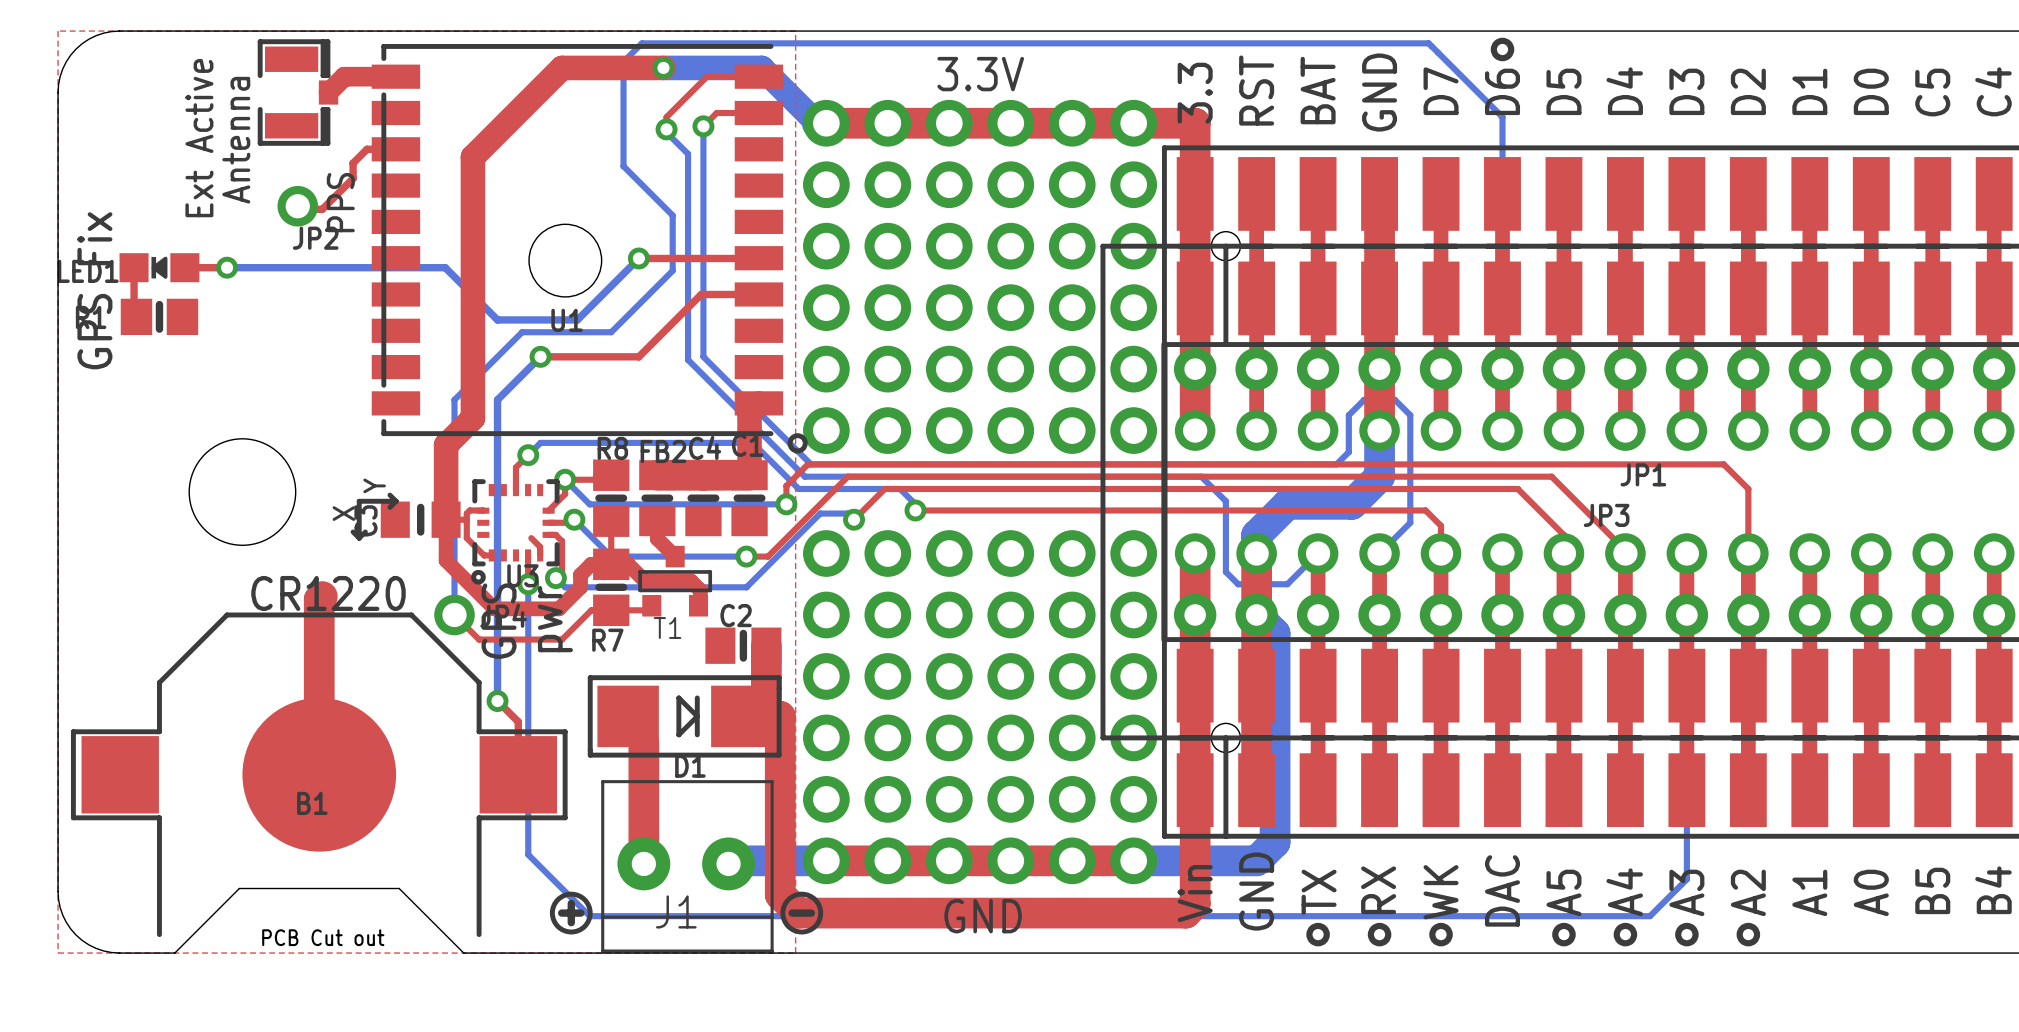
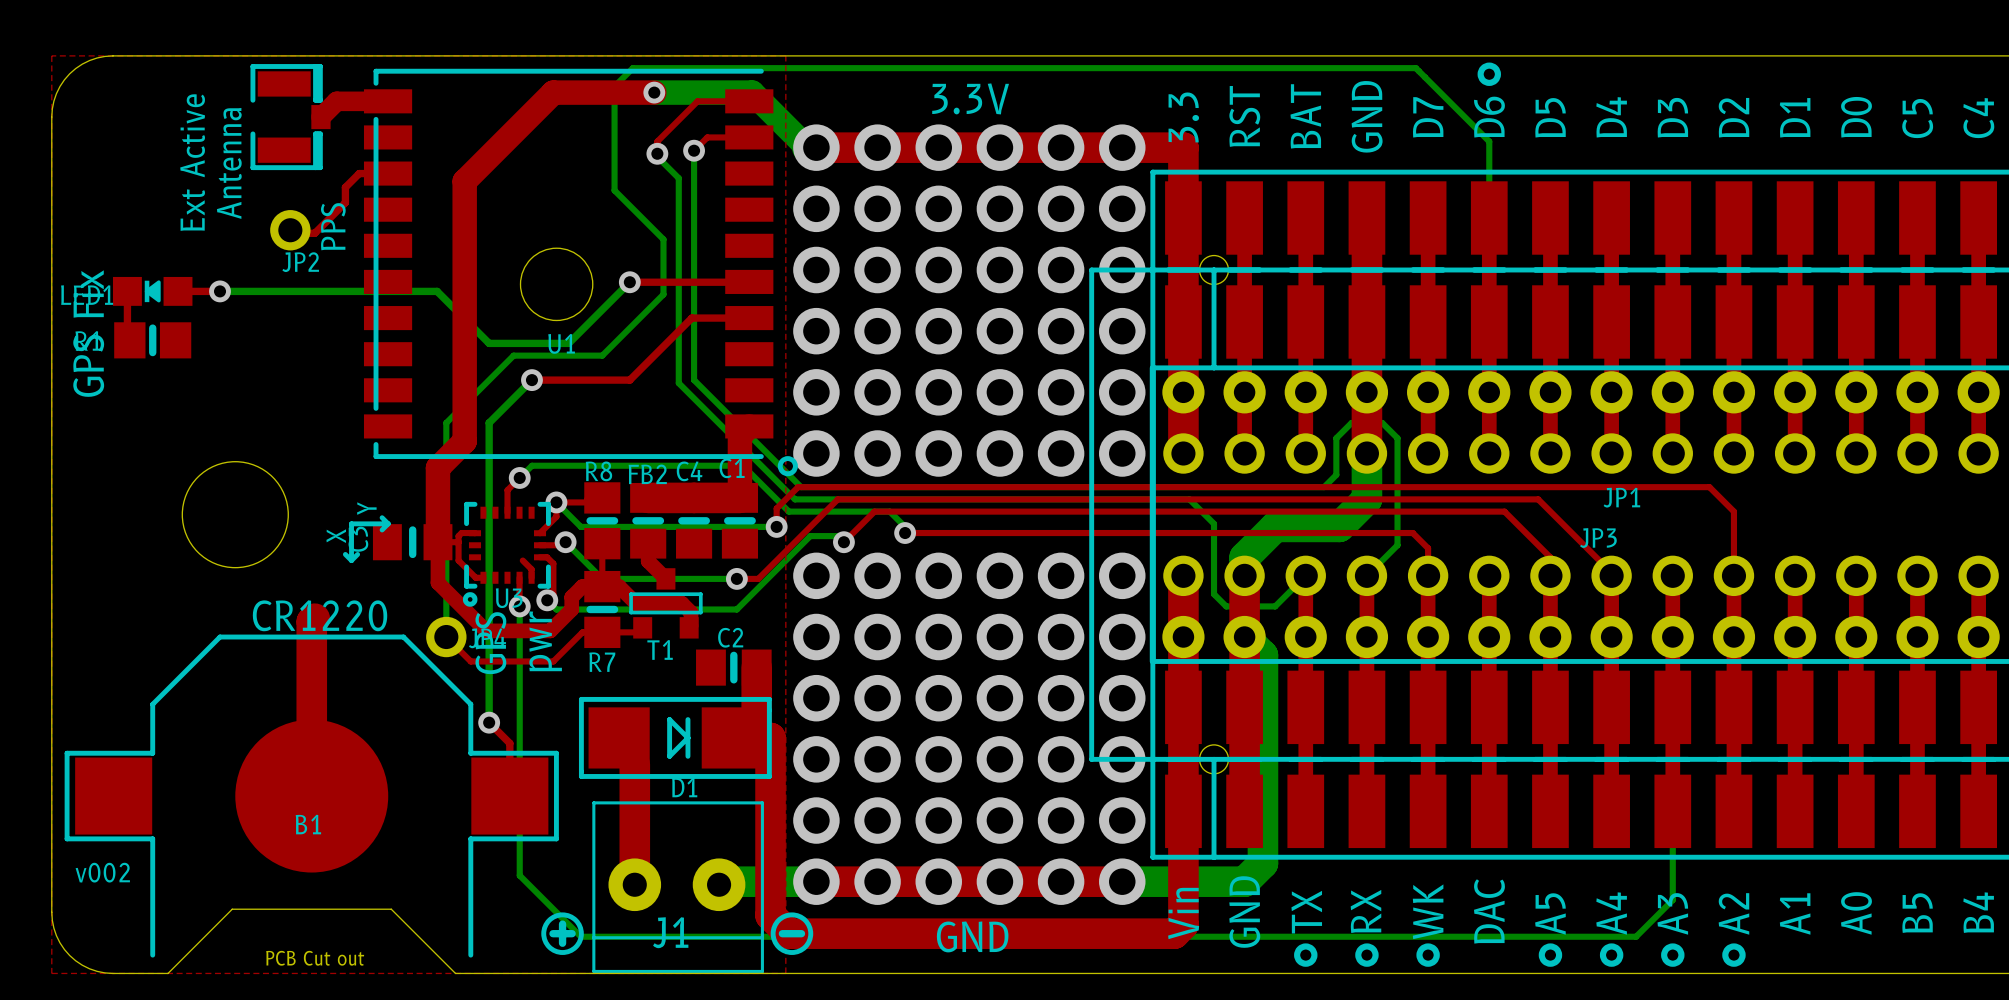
text: none -> v002 (102, 872)

